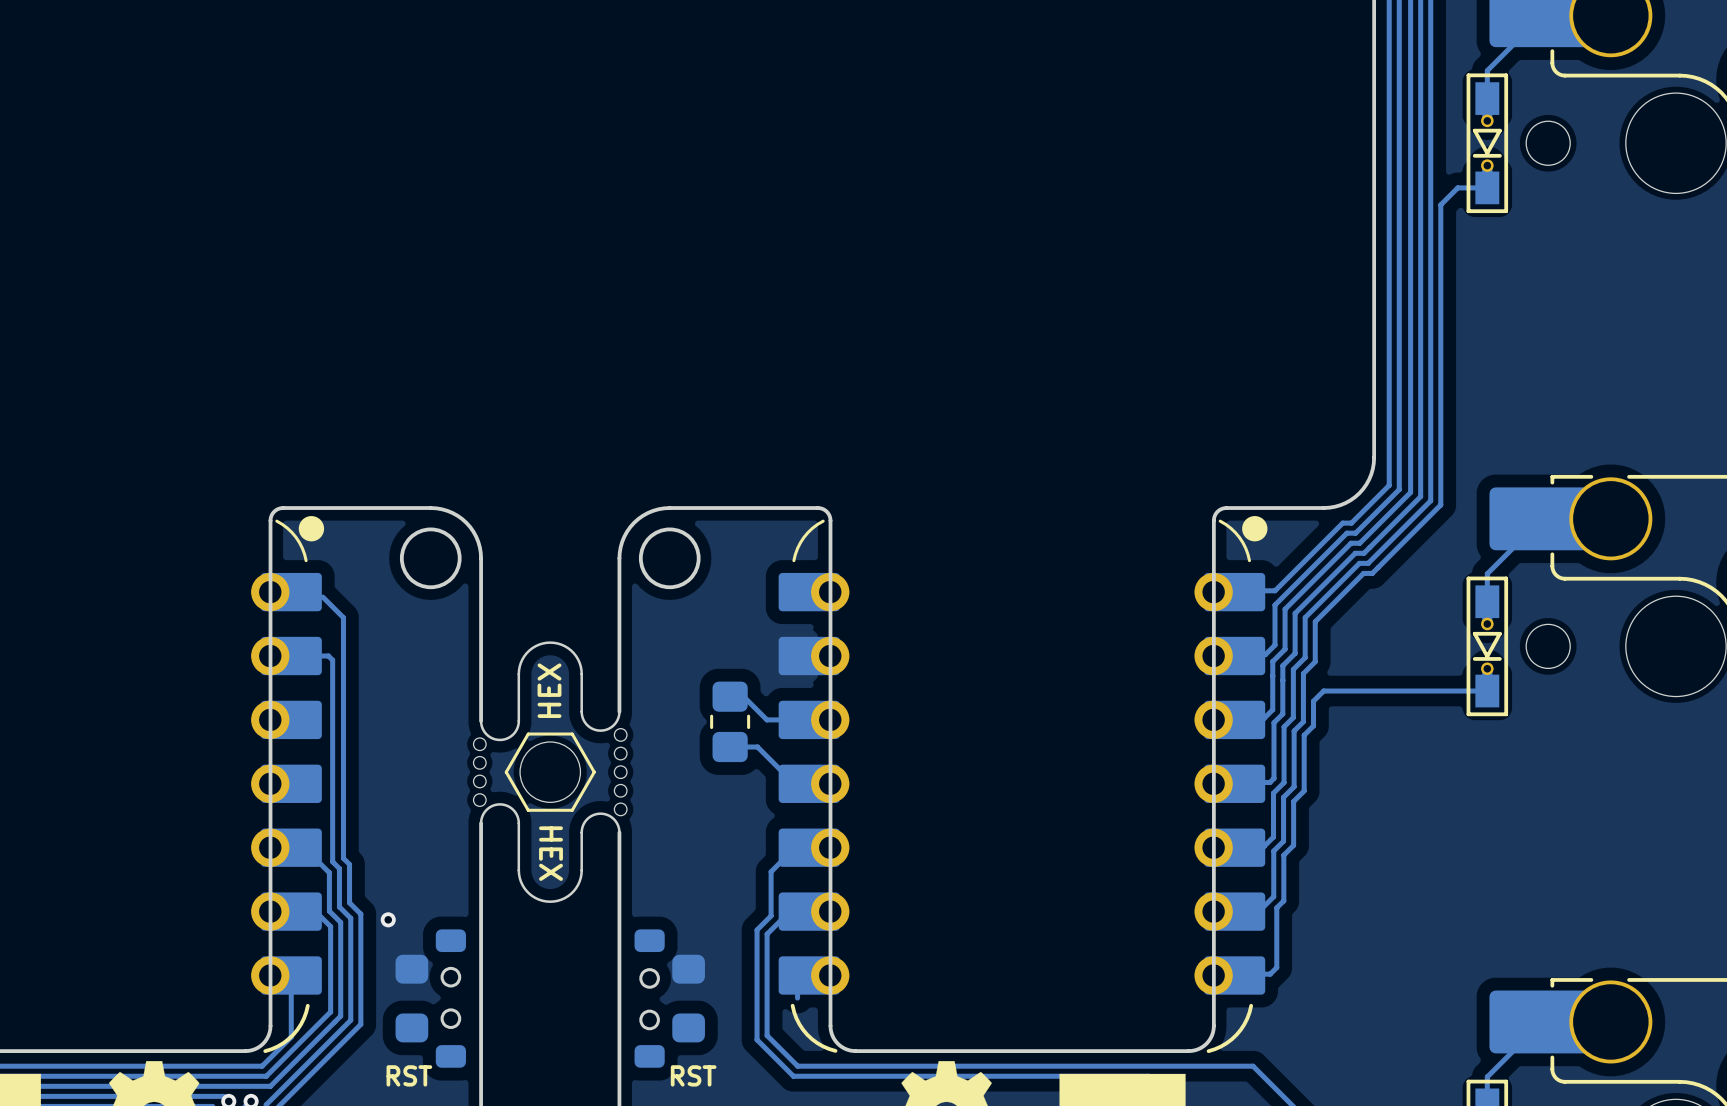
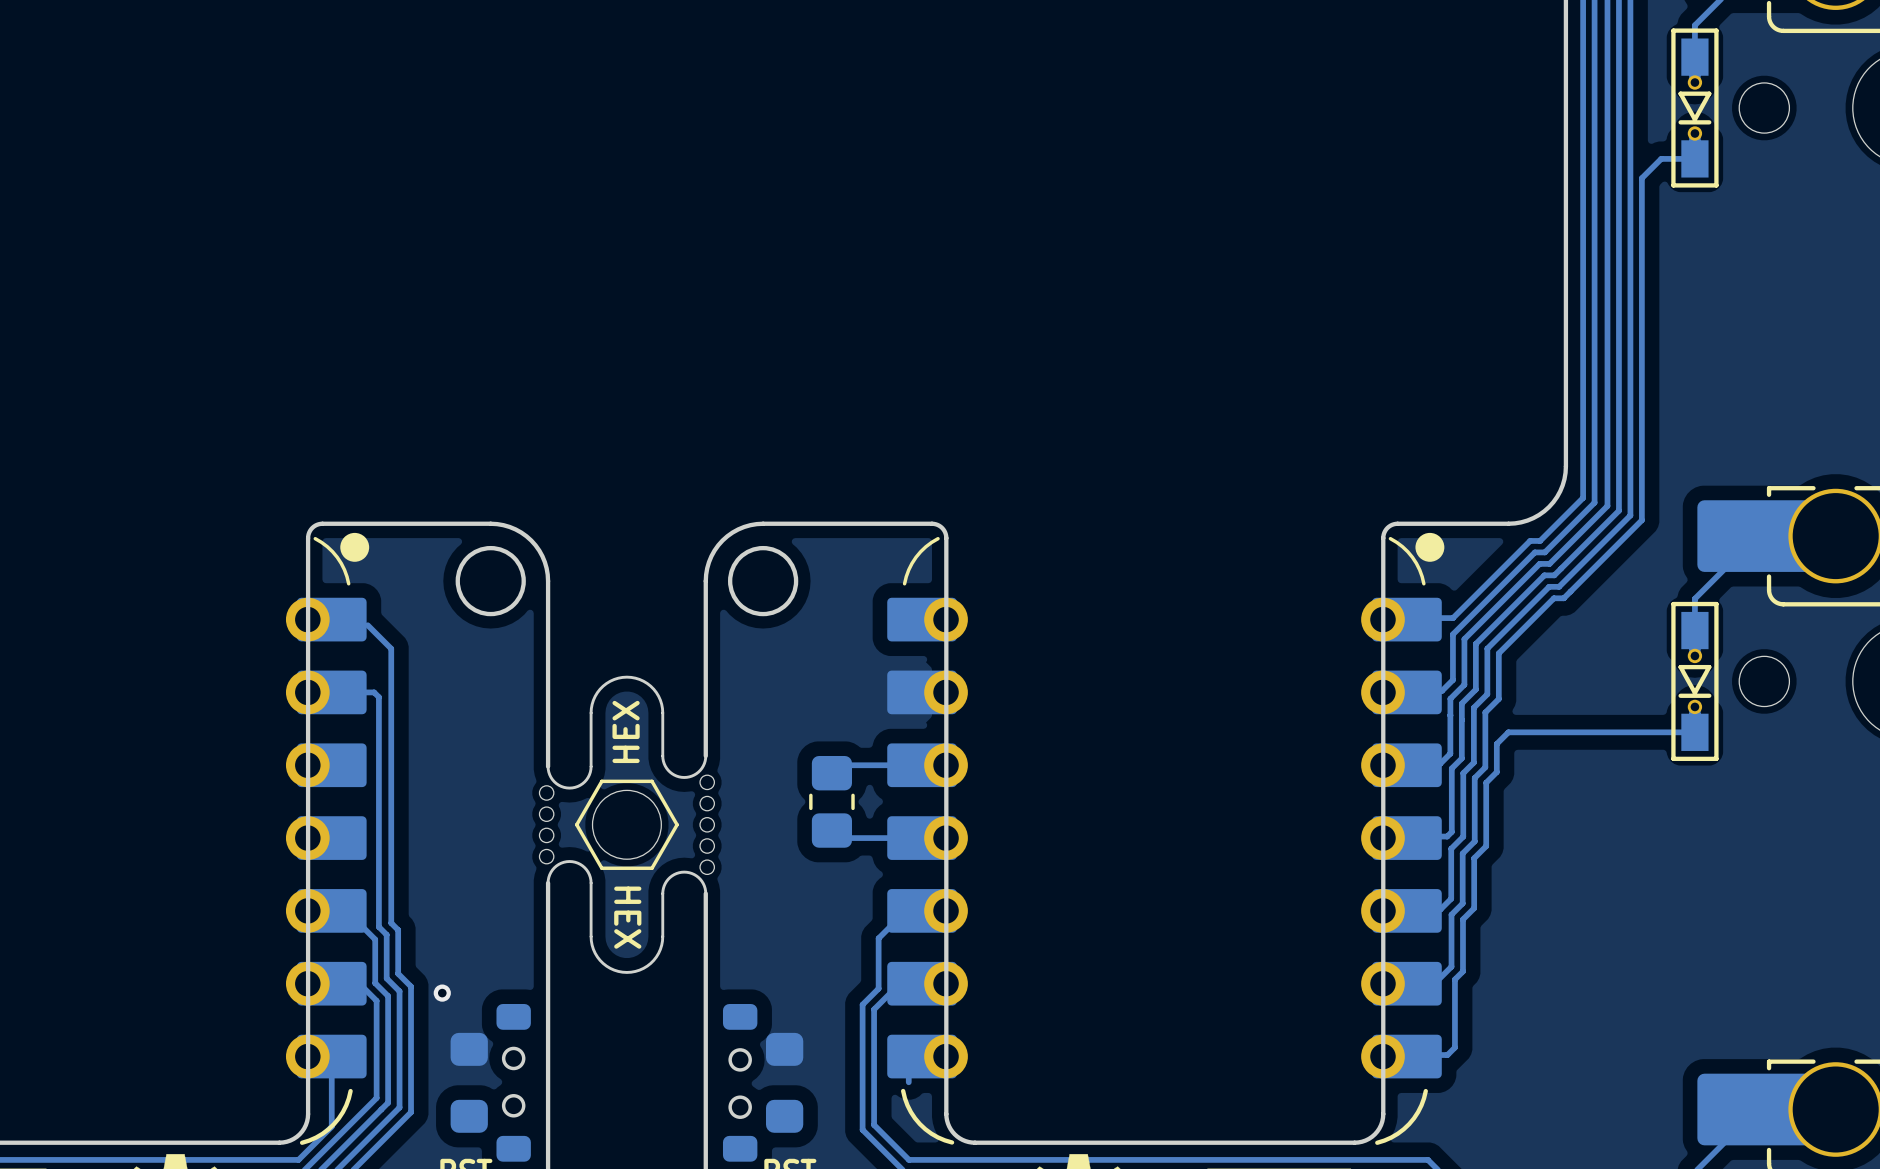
track: (730, 696) (743, 696) (766, 719) -> (831, 773) (839, 765) (873, 765)
part position: (730, 721) -> (831, 801)
track: (730, 747) (757, 747) (794, 783) -> (831, 830) (839, 838) (905, 838)

